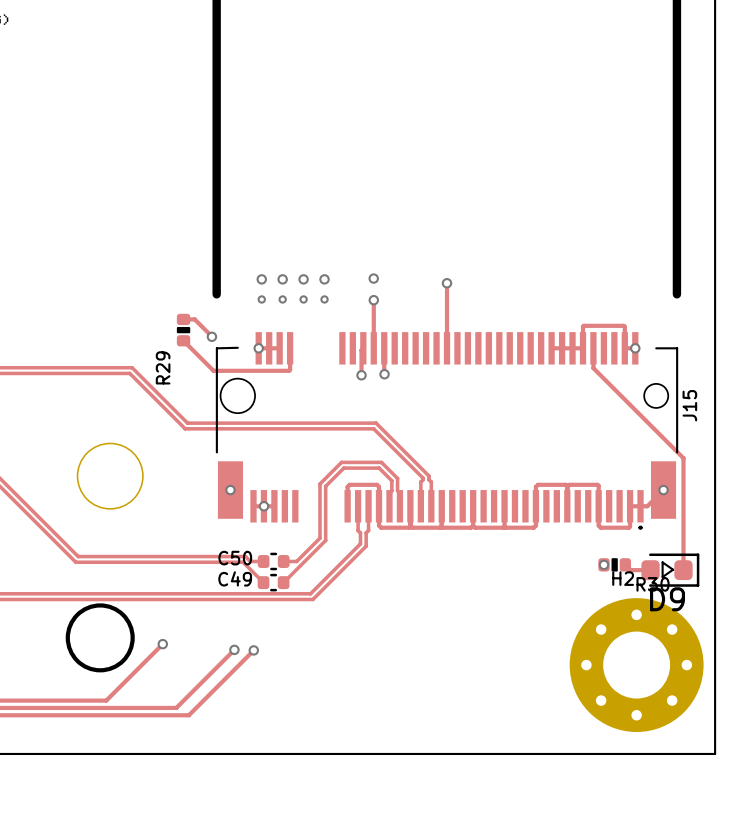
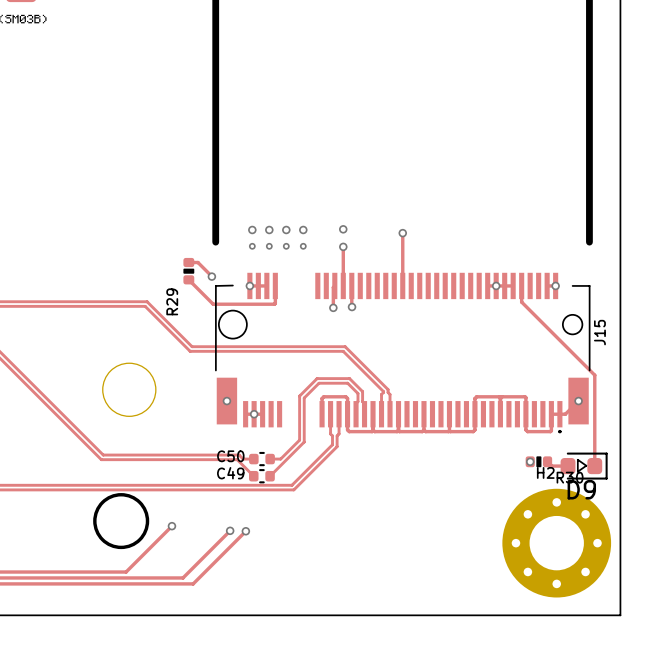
via: none -> (496, 285)
track: (582, 348) (584, 325) (623, 325) (624, 348) -> none

